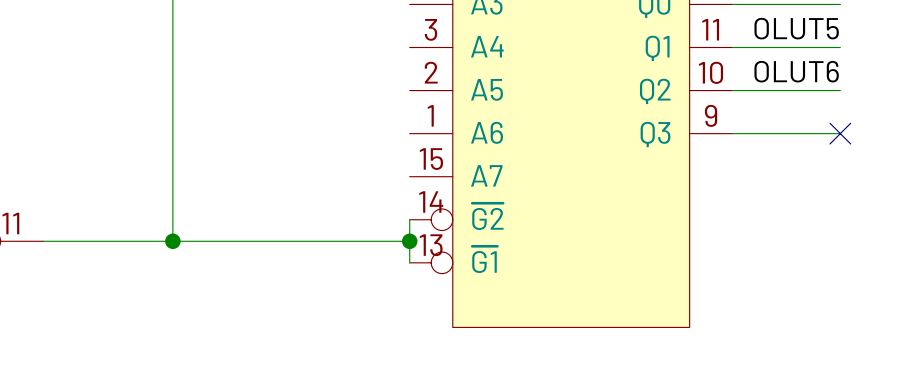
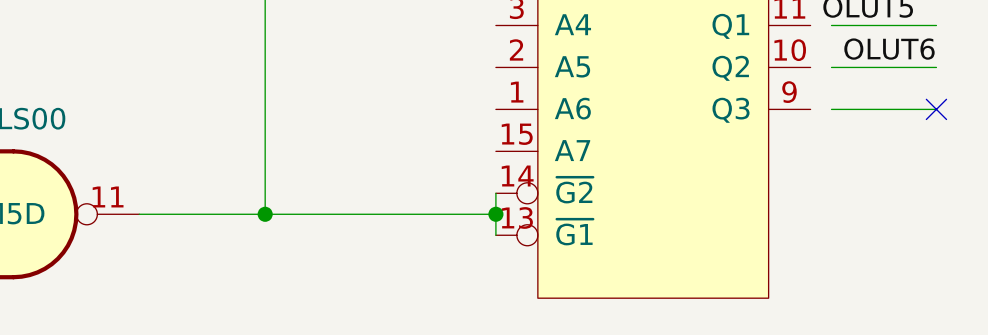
wire: (732, 47) (754, 47) -> (915, 25) (936, 25)
label position: OLUT6 (796, 71) -> OLUT6 (889, 49)
wire: (732, 90) (754, 90) -> (915, 67) (936, 67)
wire: (732, 133) (754, 133) -> (915, 109) (936, 109)
no-connect mark position: (840, 133) -> (936, 109)

